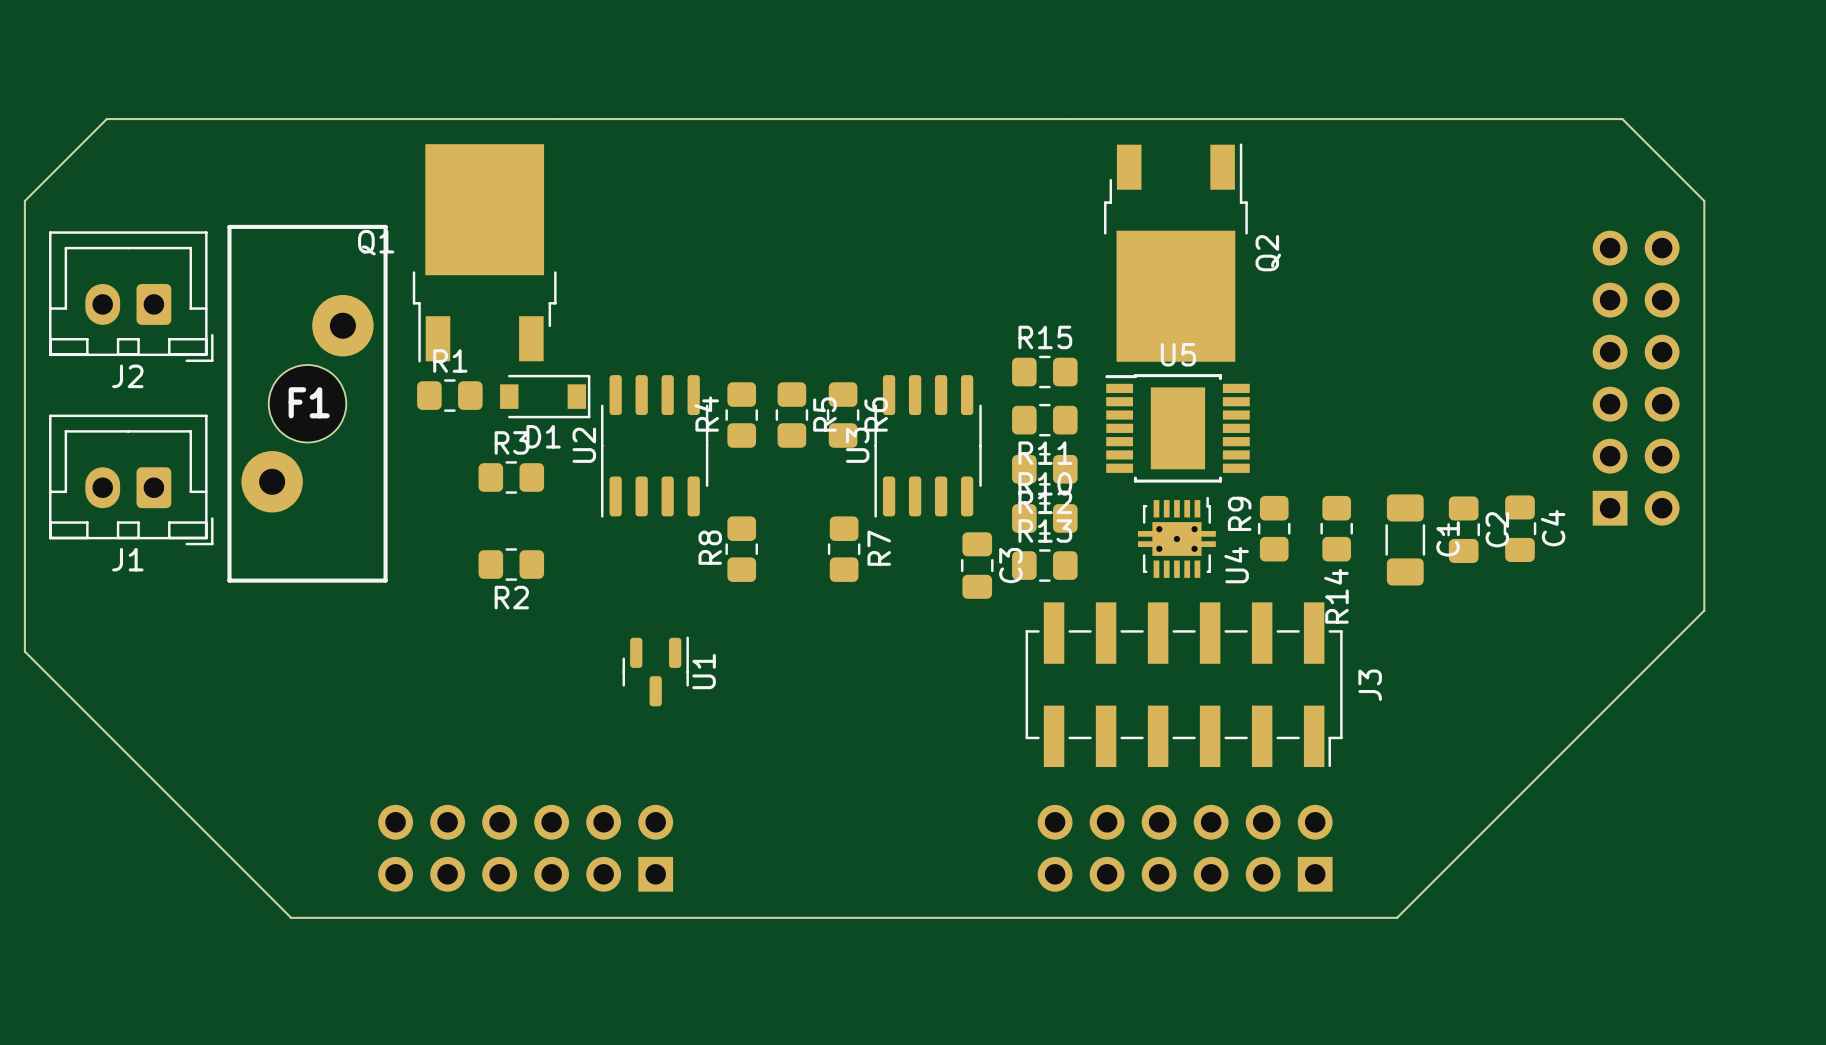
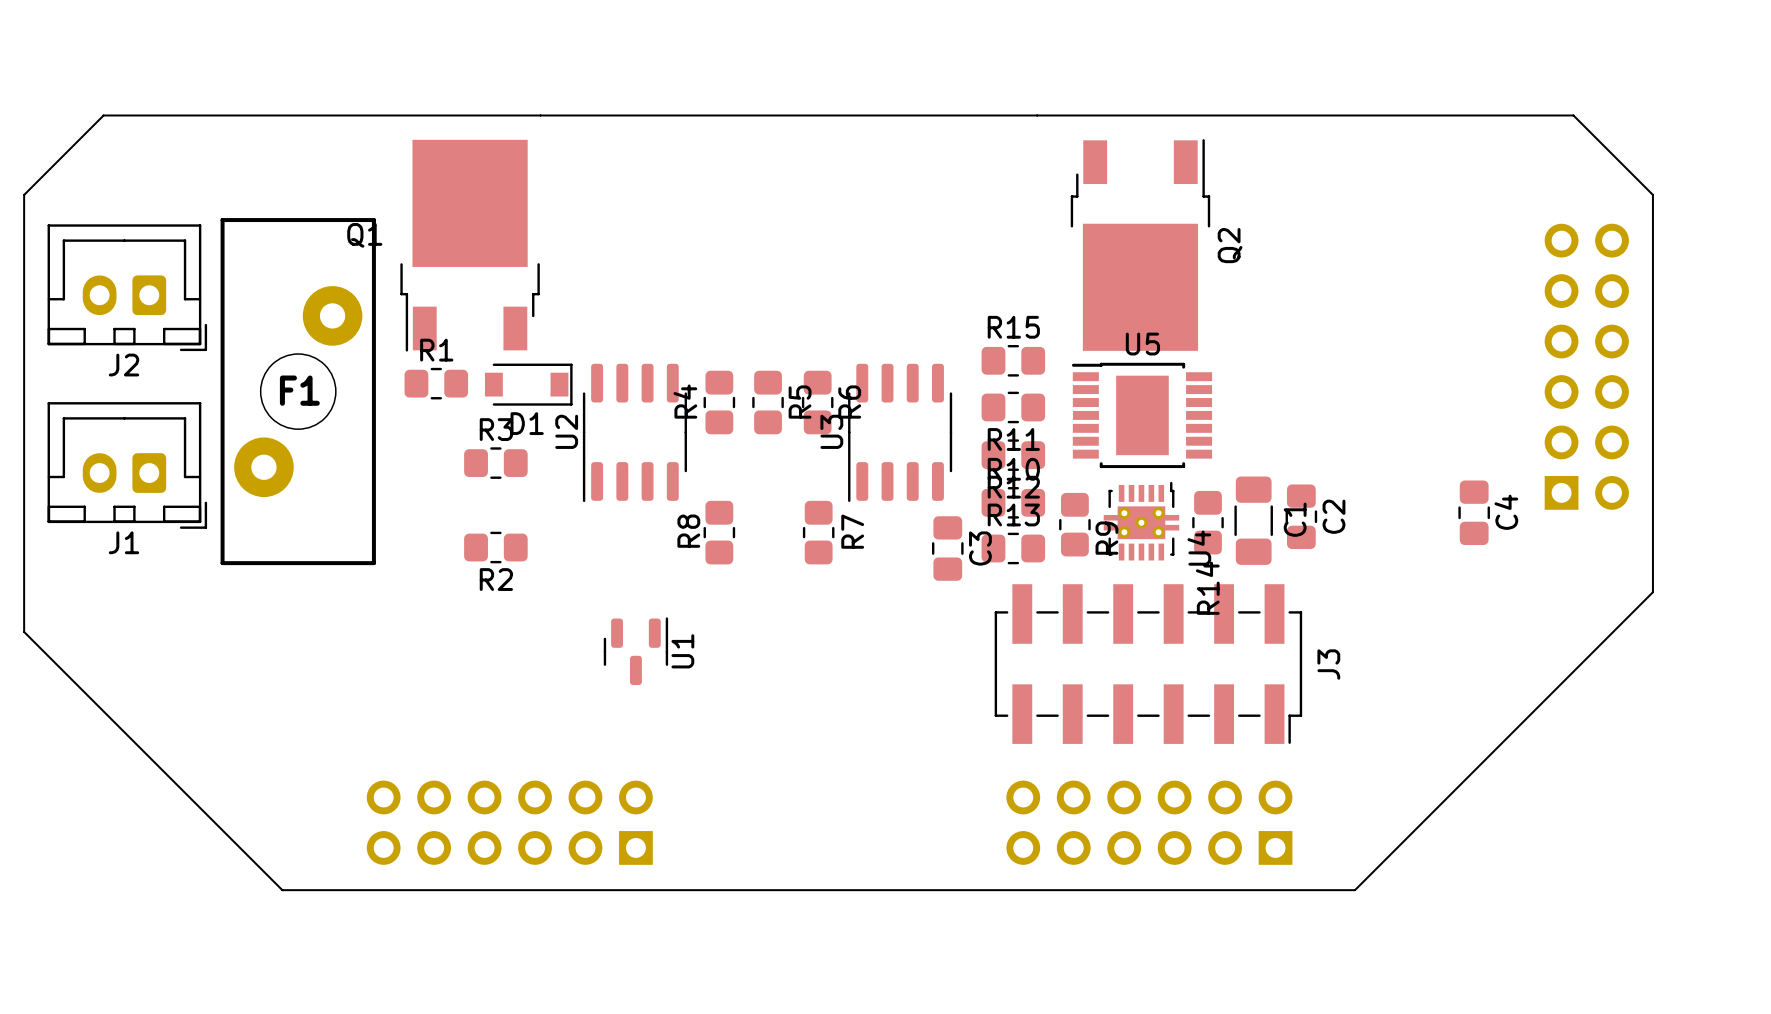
R9 name position: R9 (1239, 513) -> R9 (1106, 538)
R9 position: (1274, 528) -> (1074, 524)
R14 position: (1336, 528) -> (1208, 522)
C2 position: (1463, 529) -> (1301, 516)
C1 position: (1405, 539) -> (1253, 520)

